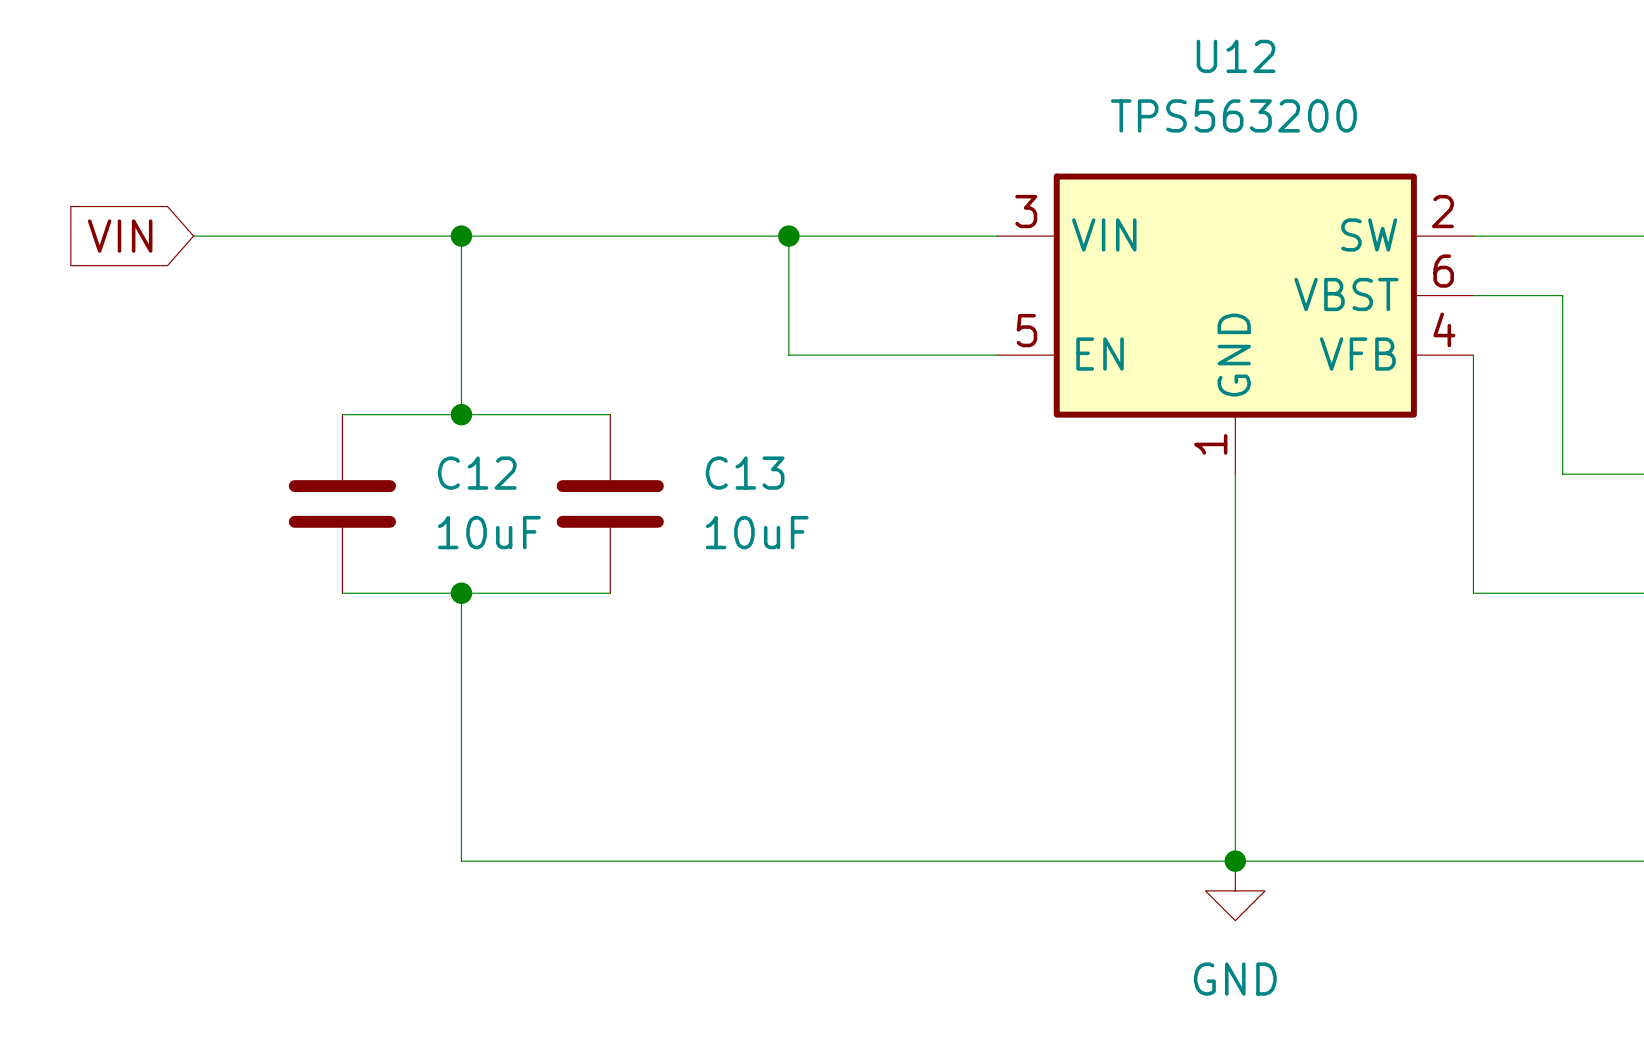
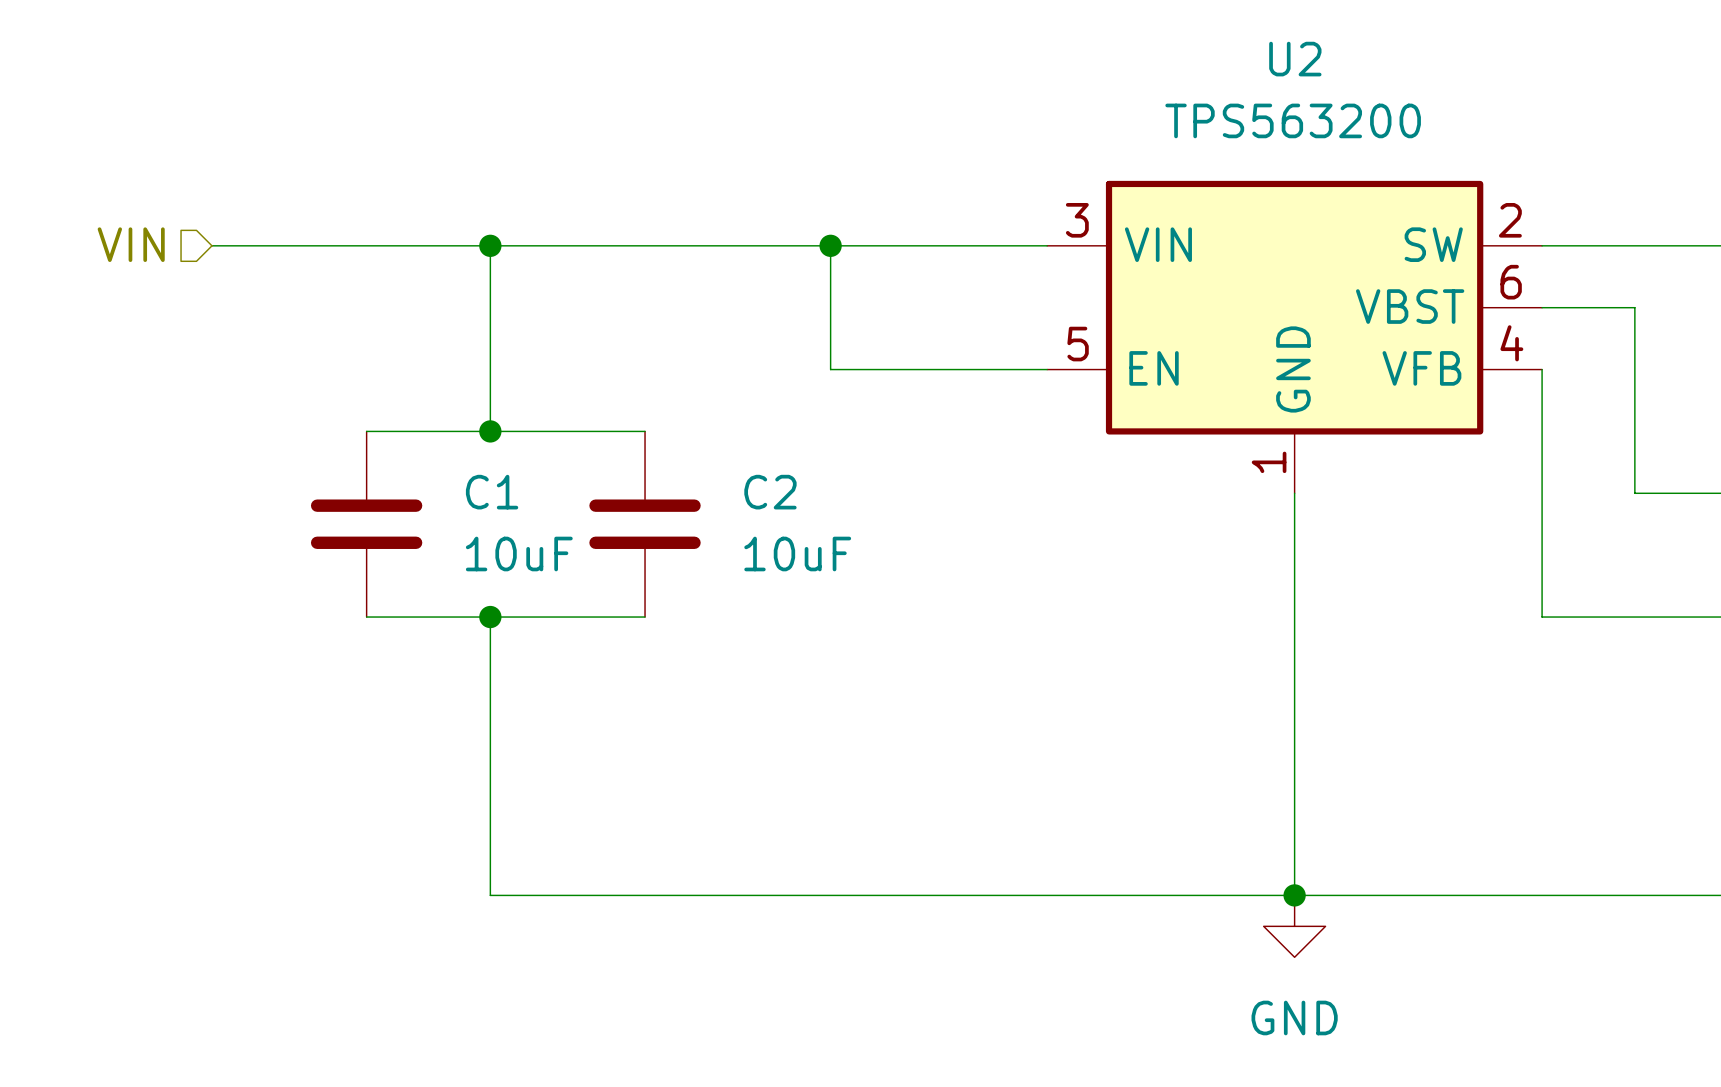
U12 name: U12 (1236, 56) -> U2 (1295, 59)
hierarchical label: none -> VIN (131, 244)
global label: VIN (120, 236) -> none
C12 name: C12 (477, 473) -> C1 (492, 492)
C13 name: C13 (745, 473) -> C2 (770, 492)

